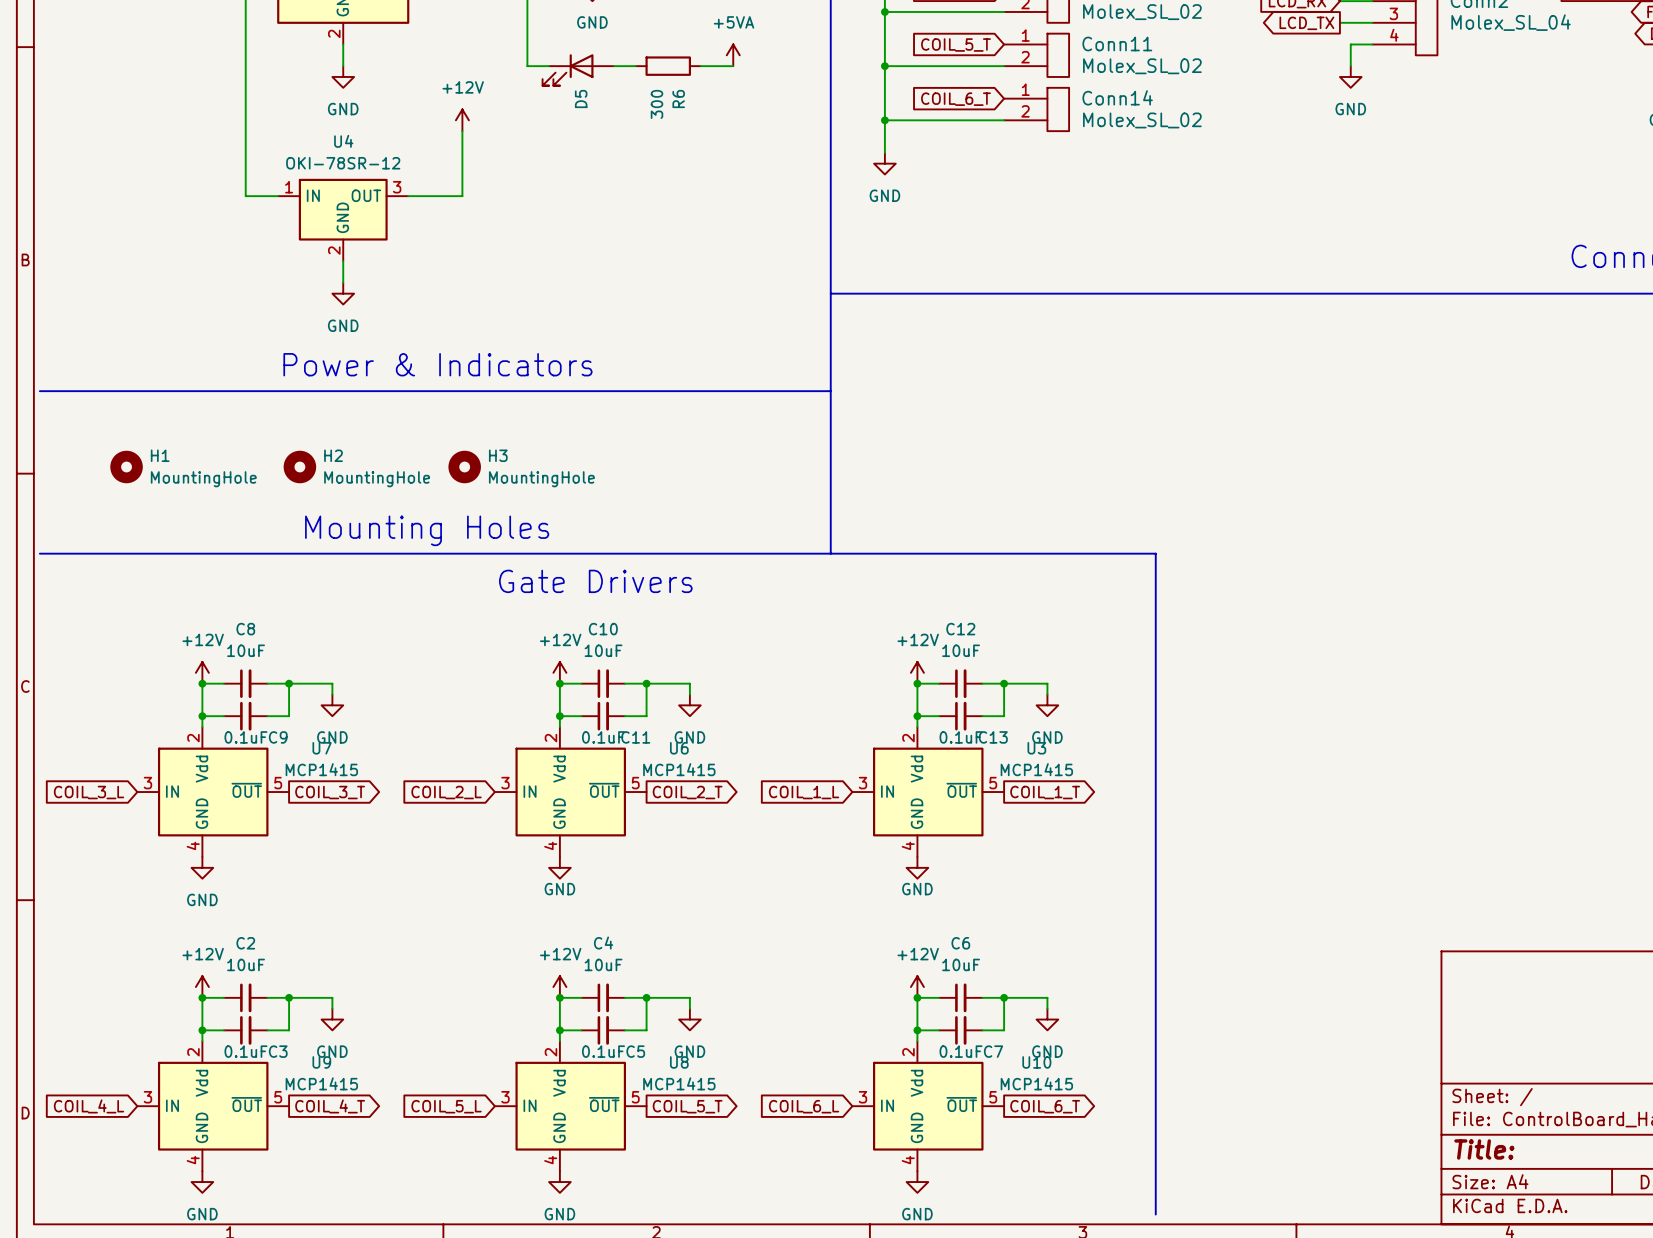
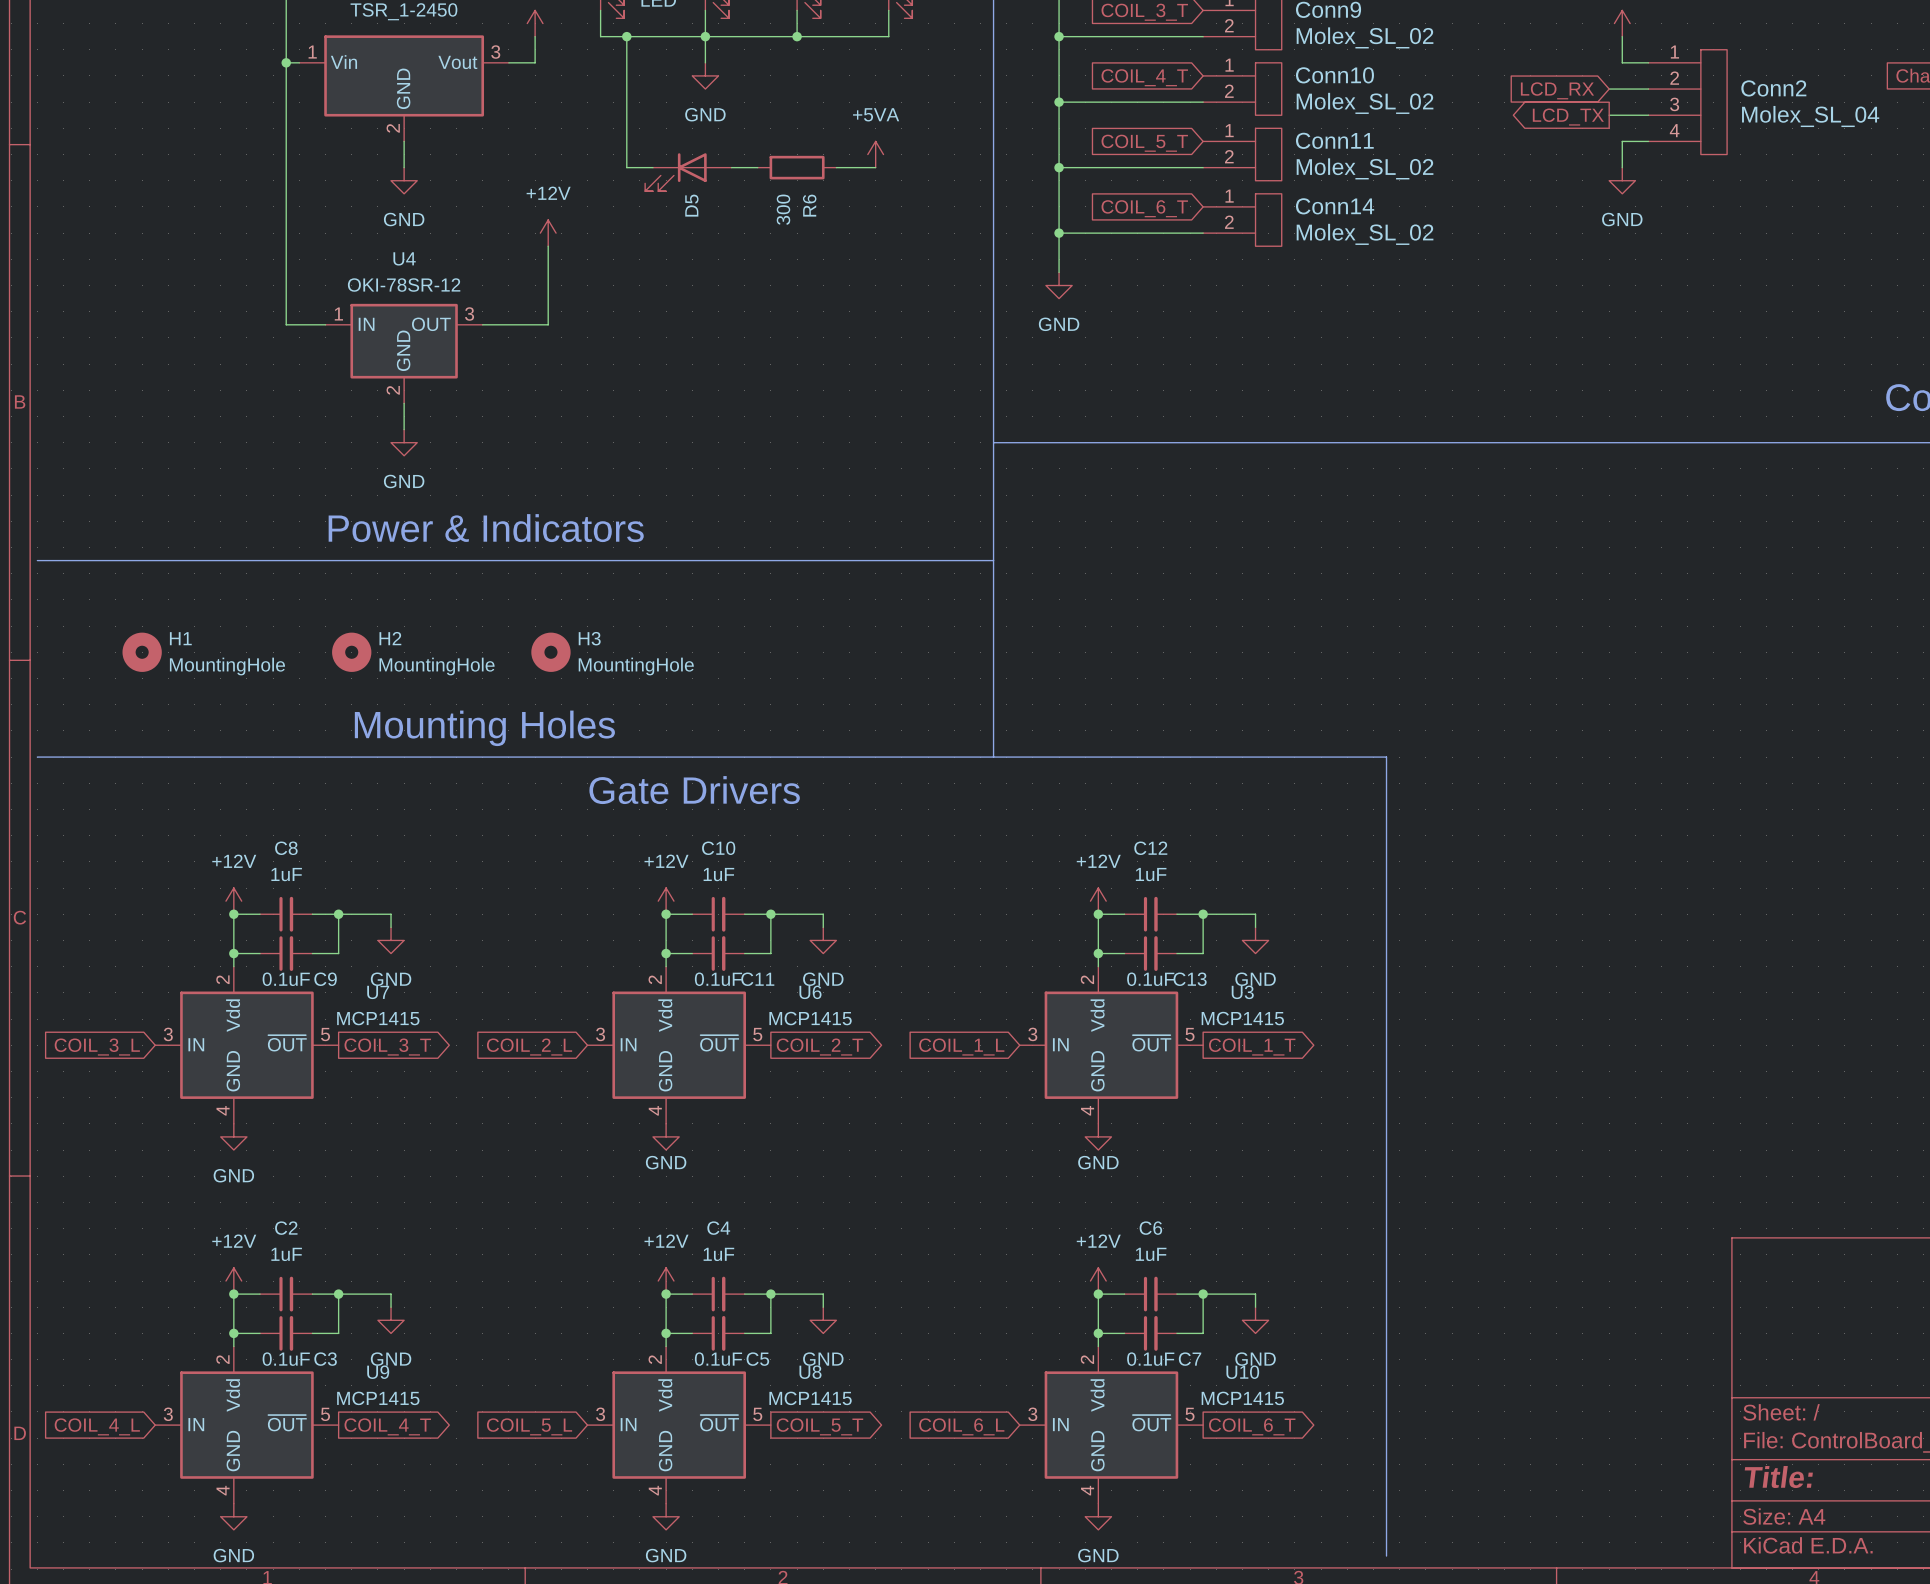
C8 value: 10uF (246, 650) -> 1uF (286, 874)
C10 value: 10uF (603, 650) -> 1uF (718, 874)
C12 value: 10uF (961, 650) -> 1uF (1151, 874)
C2 value: 10uF (246, 964) -> 1uF (286, 1254)
C4 value: 10uF (603, 964) -> 1uF (718, 1254)
C6 value: 10uF (961, 964) -> 1uF (1151, 1254)

